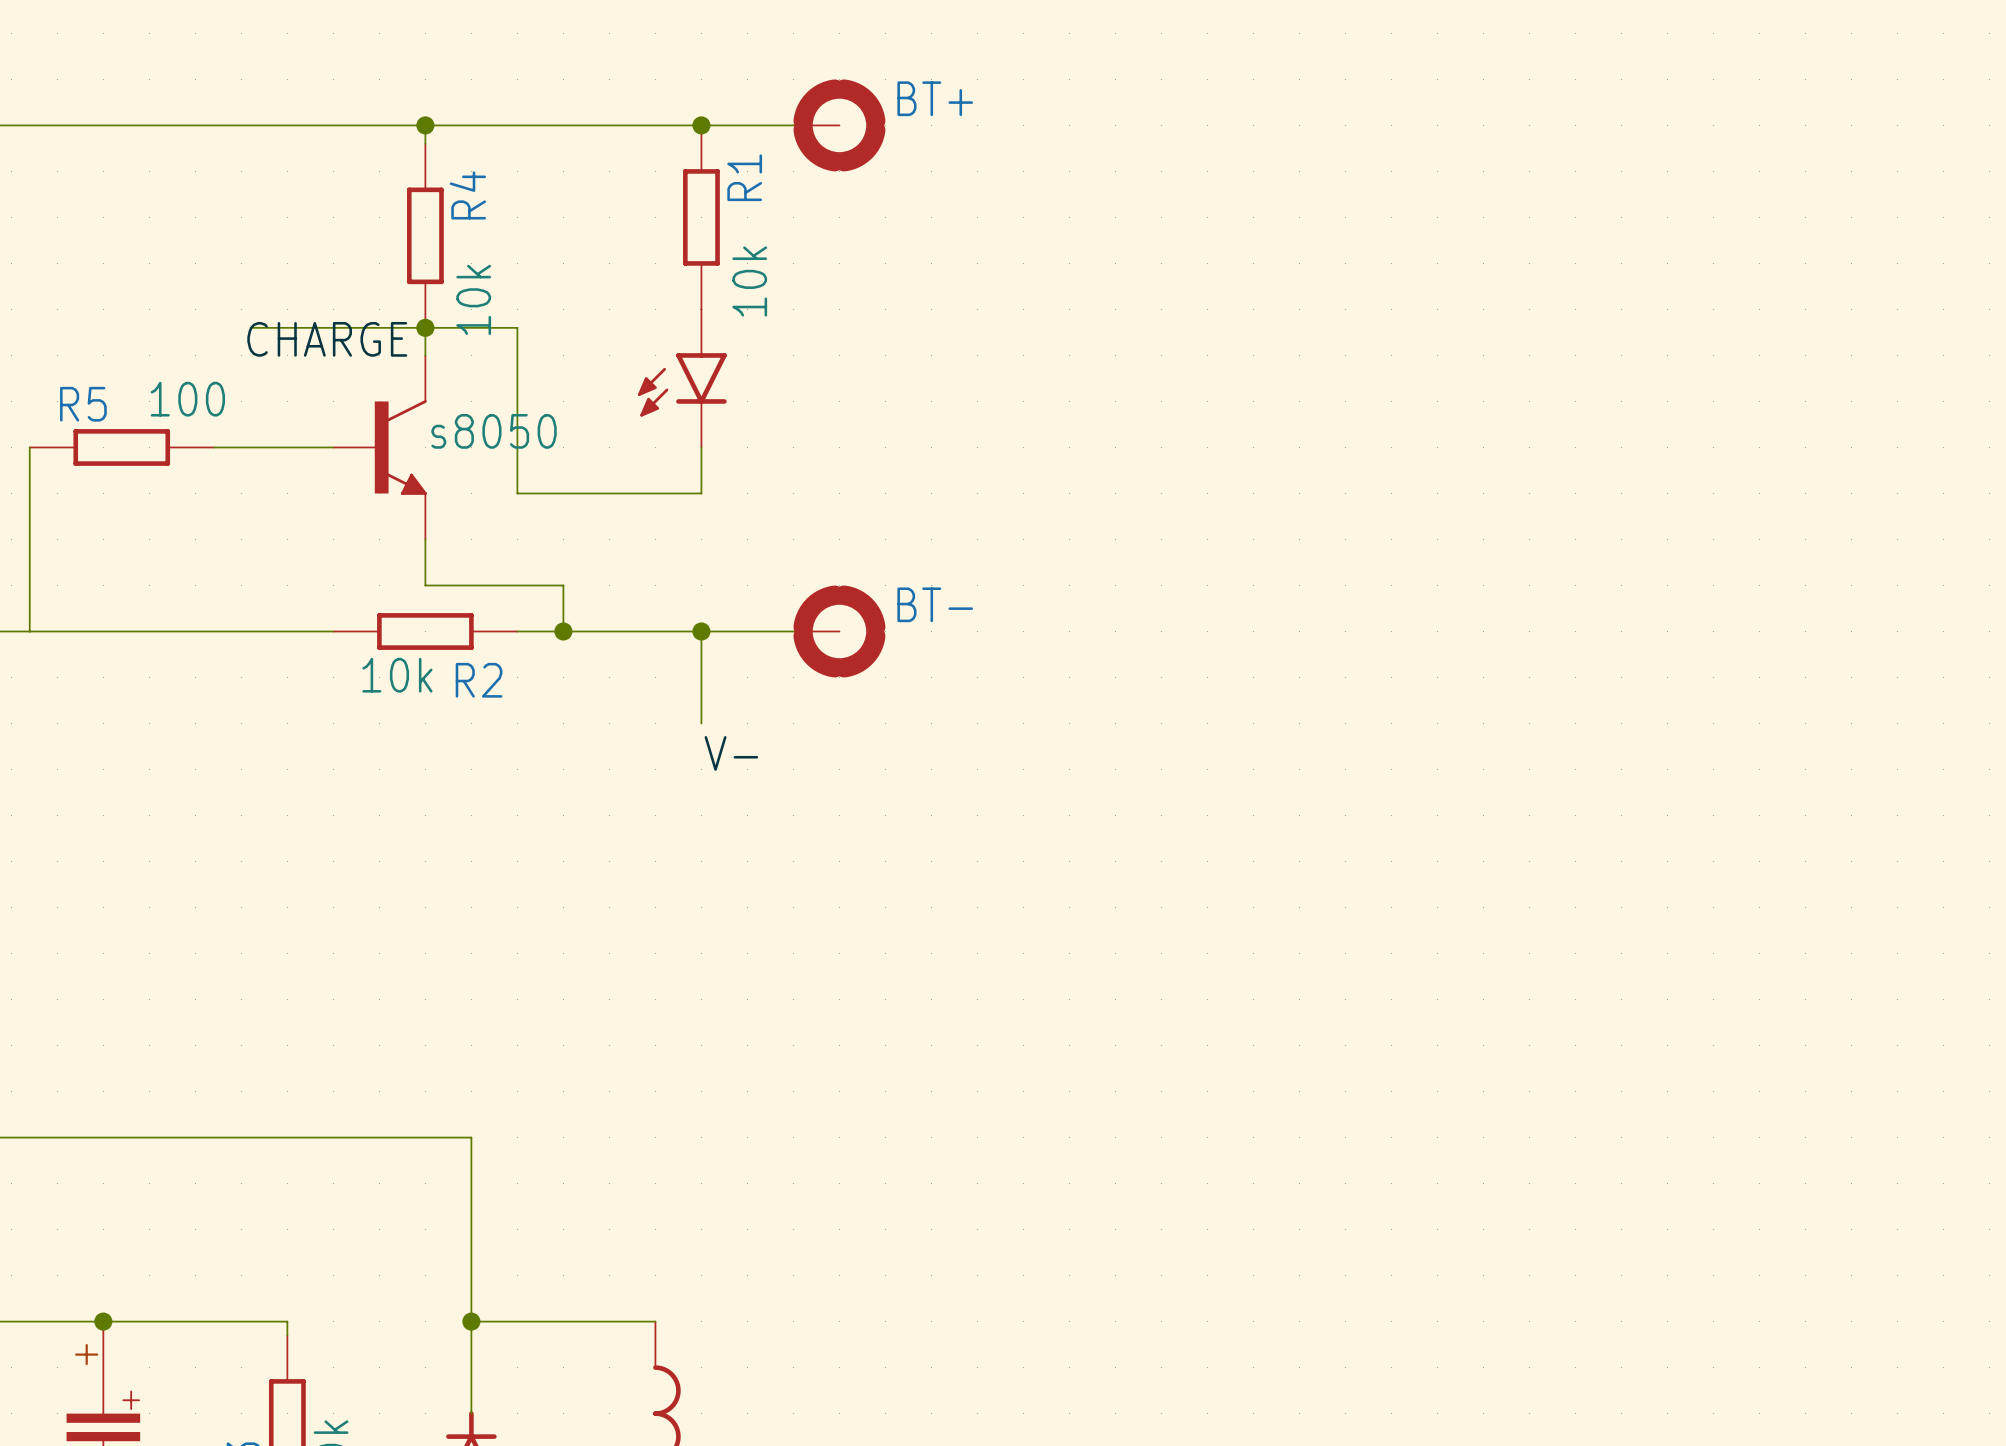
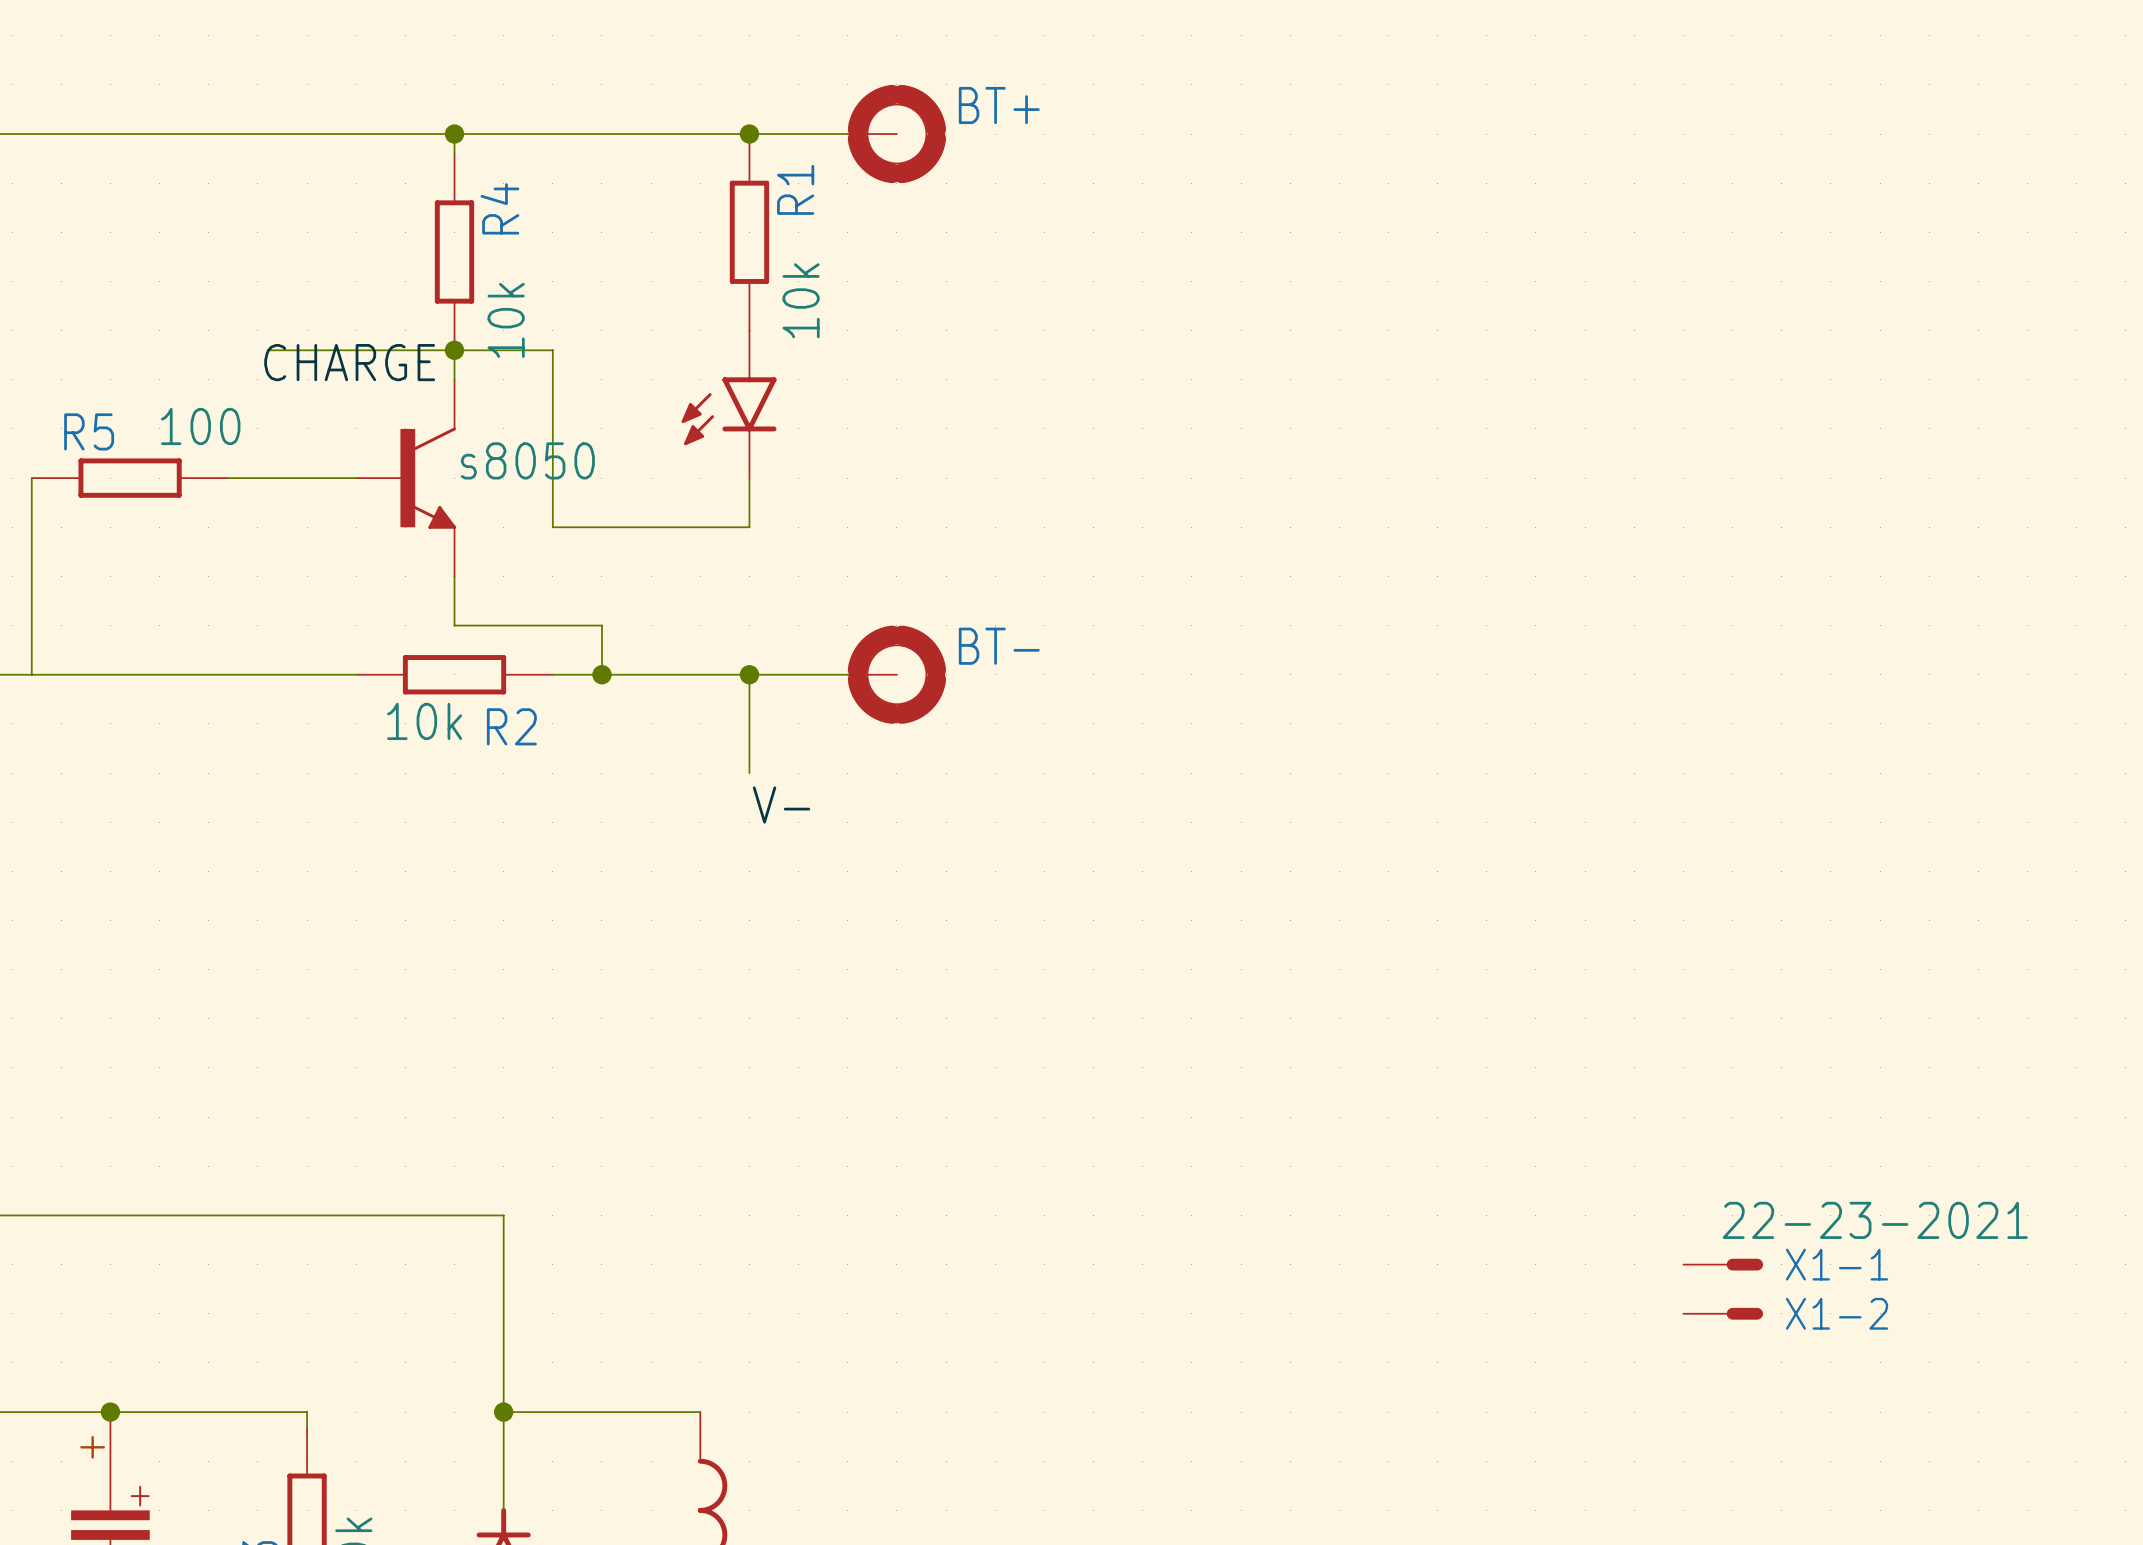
X1-1: none -> 22-23-2021 (1723, 1264)
X1-2: none -> (1723, 1313)

